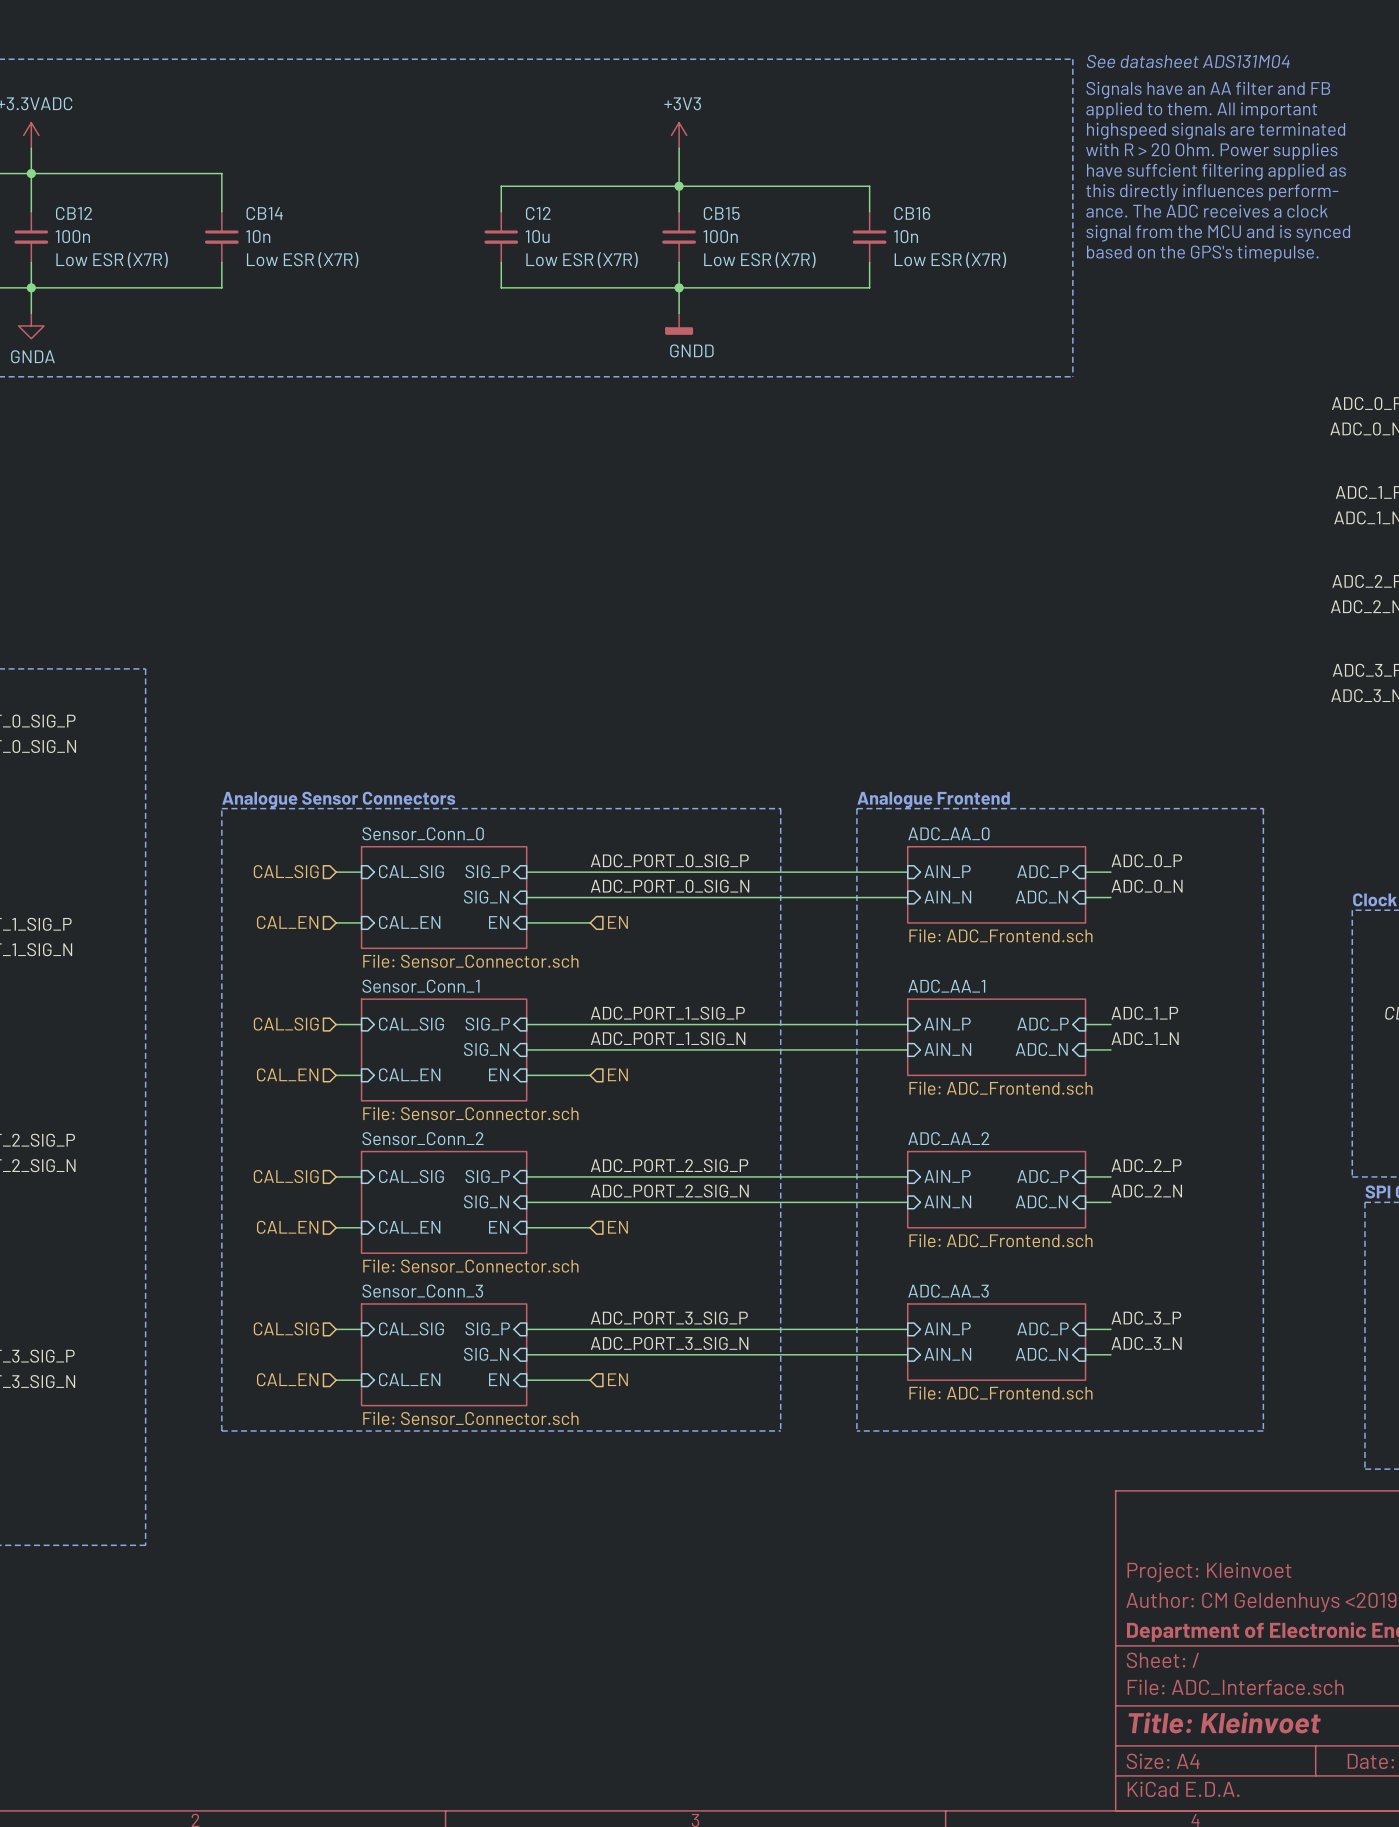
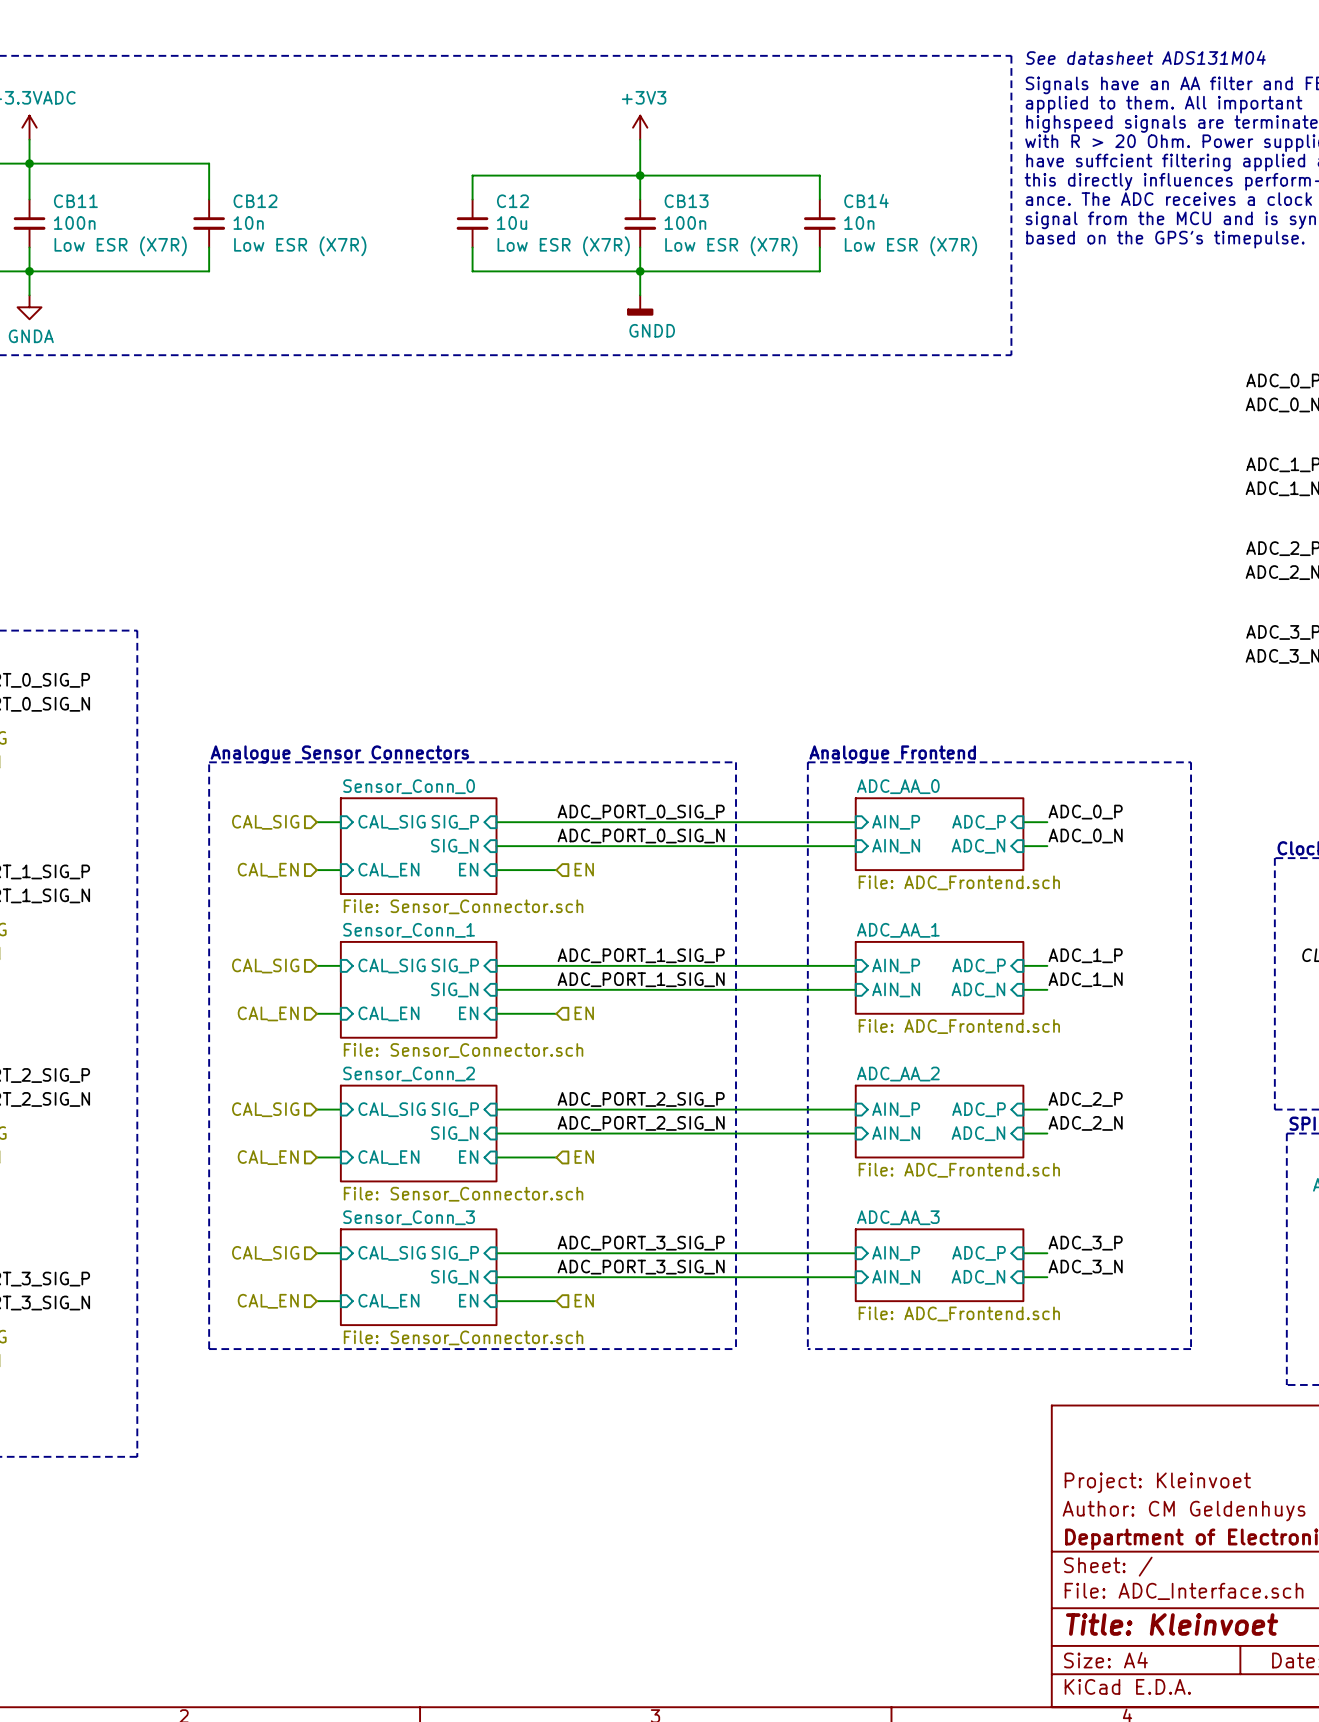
CB12 name: CB12 (74, 213) -> CB11 (75, 201)
CB14 name: CB14 (264, 213) -> CB12 (255, 201)
CB15 name: CB15 (721, 213) -> CB13 (686, 201)
CB16 name: CB16 (912, 213) -> CB14 (866, 200)

